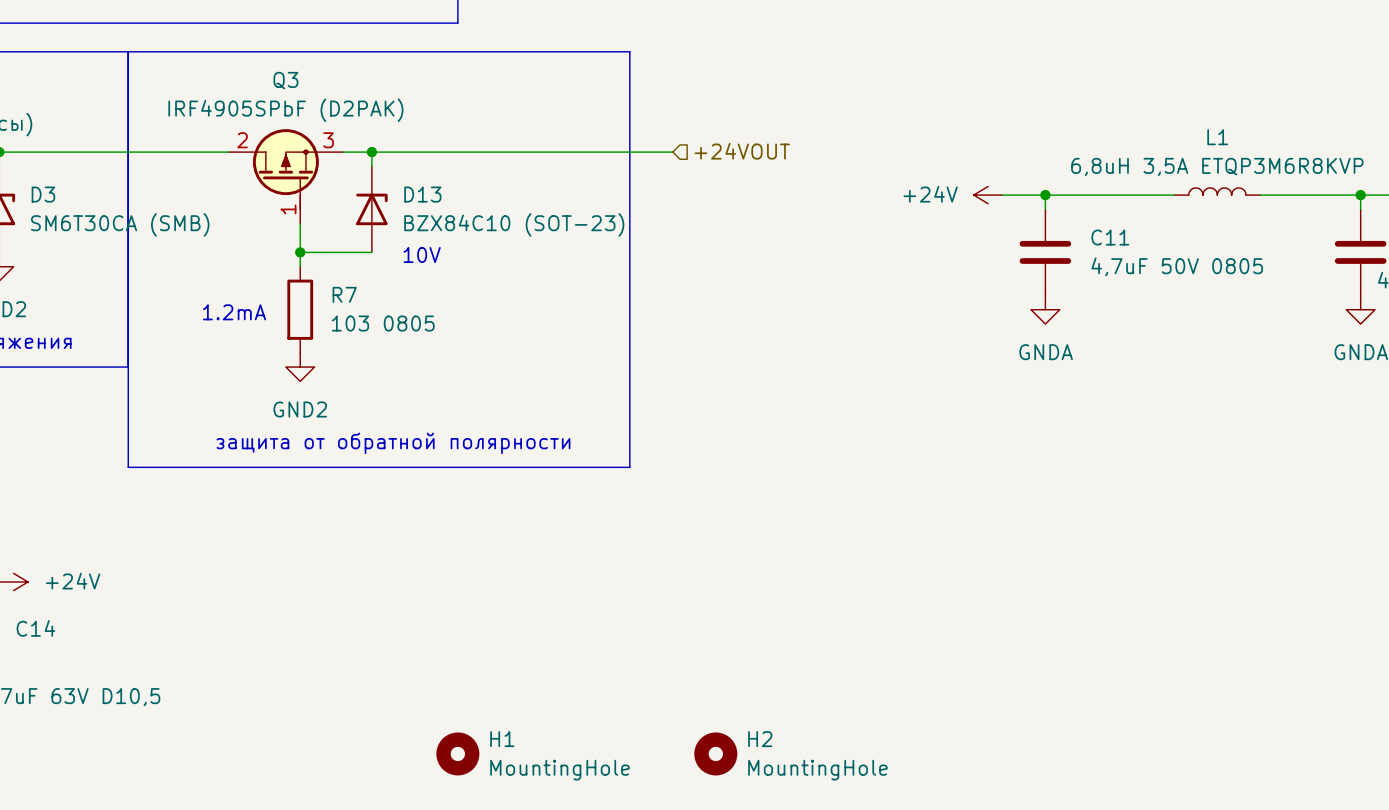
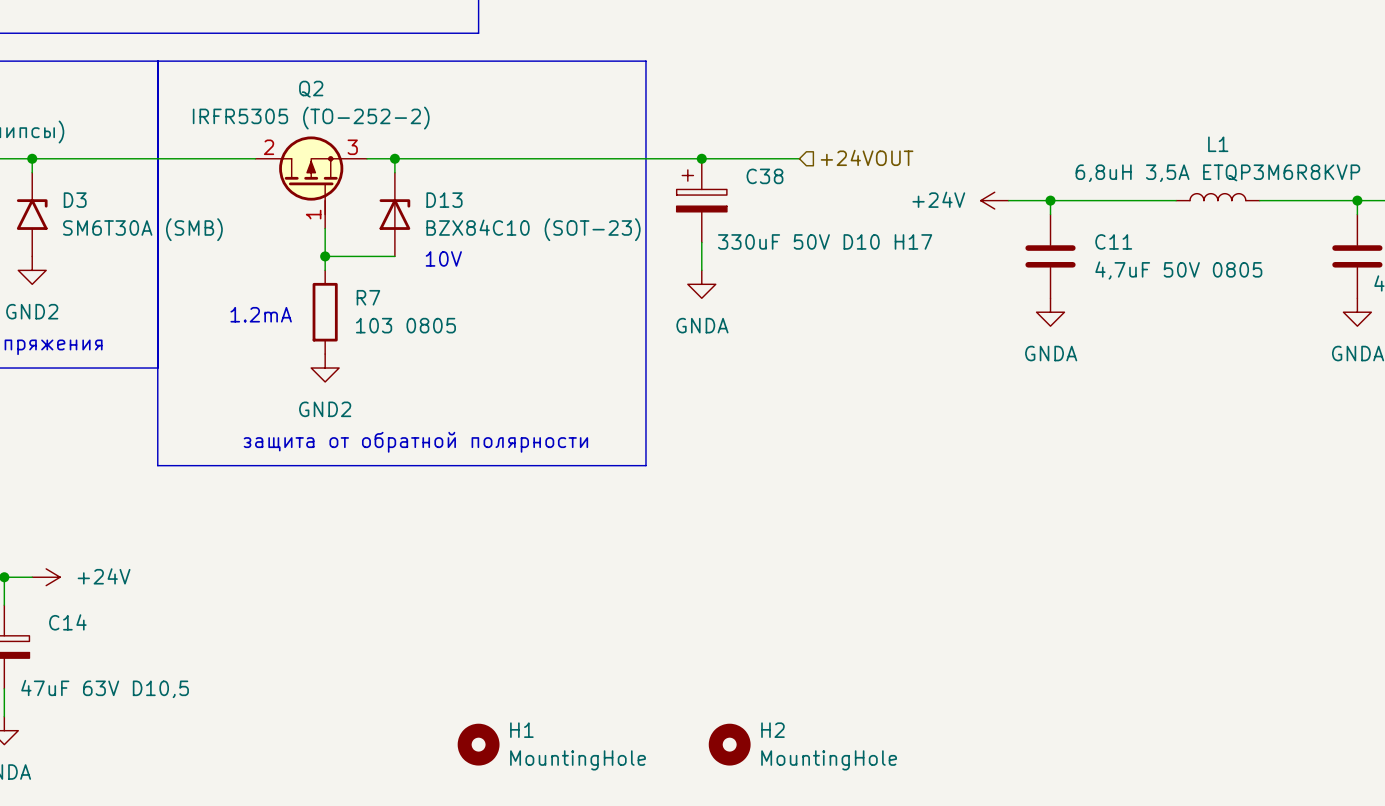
Q3 name: Q3 (285, 80) -> Q2 (311, 89)
Q3 value: IRF4905SPbF (D2PAK) (285, 110) -> IRFR5305 (TO-252-2) (311, 118)
hierarchical label position: +24VOUT (742, 151) -> +24VOUT (867, 157)
wire: none -> (687, 158) (799, 158)
junction: none -> (701, 158)
C38: none -> 330uF 50V D10 H17 (701, 200)
D3 value: SM6T30СA (SMB) (120, 224) -> SM6T30A (SMB) (142, 229)
wire: none -> (701, 242) (701, 270)
power symbol: none -> GNDA (701, 284)

